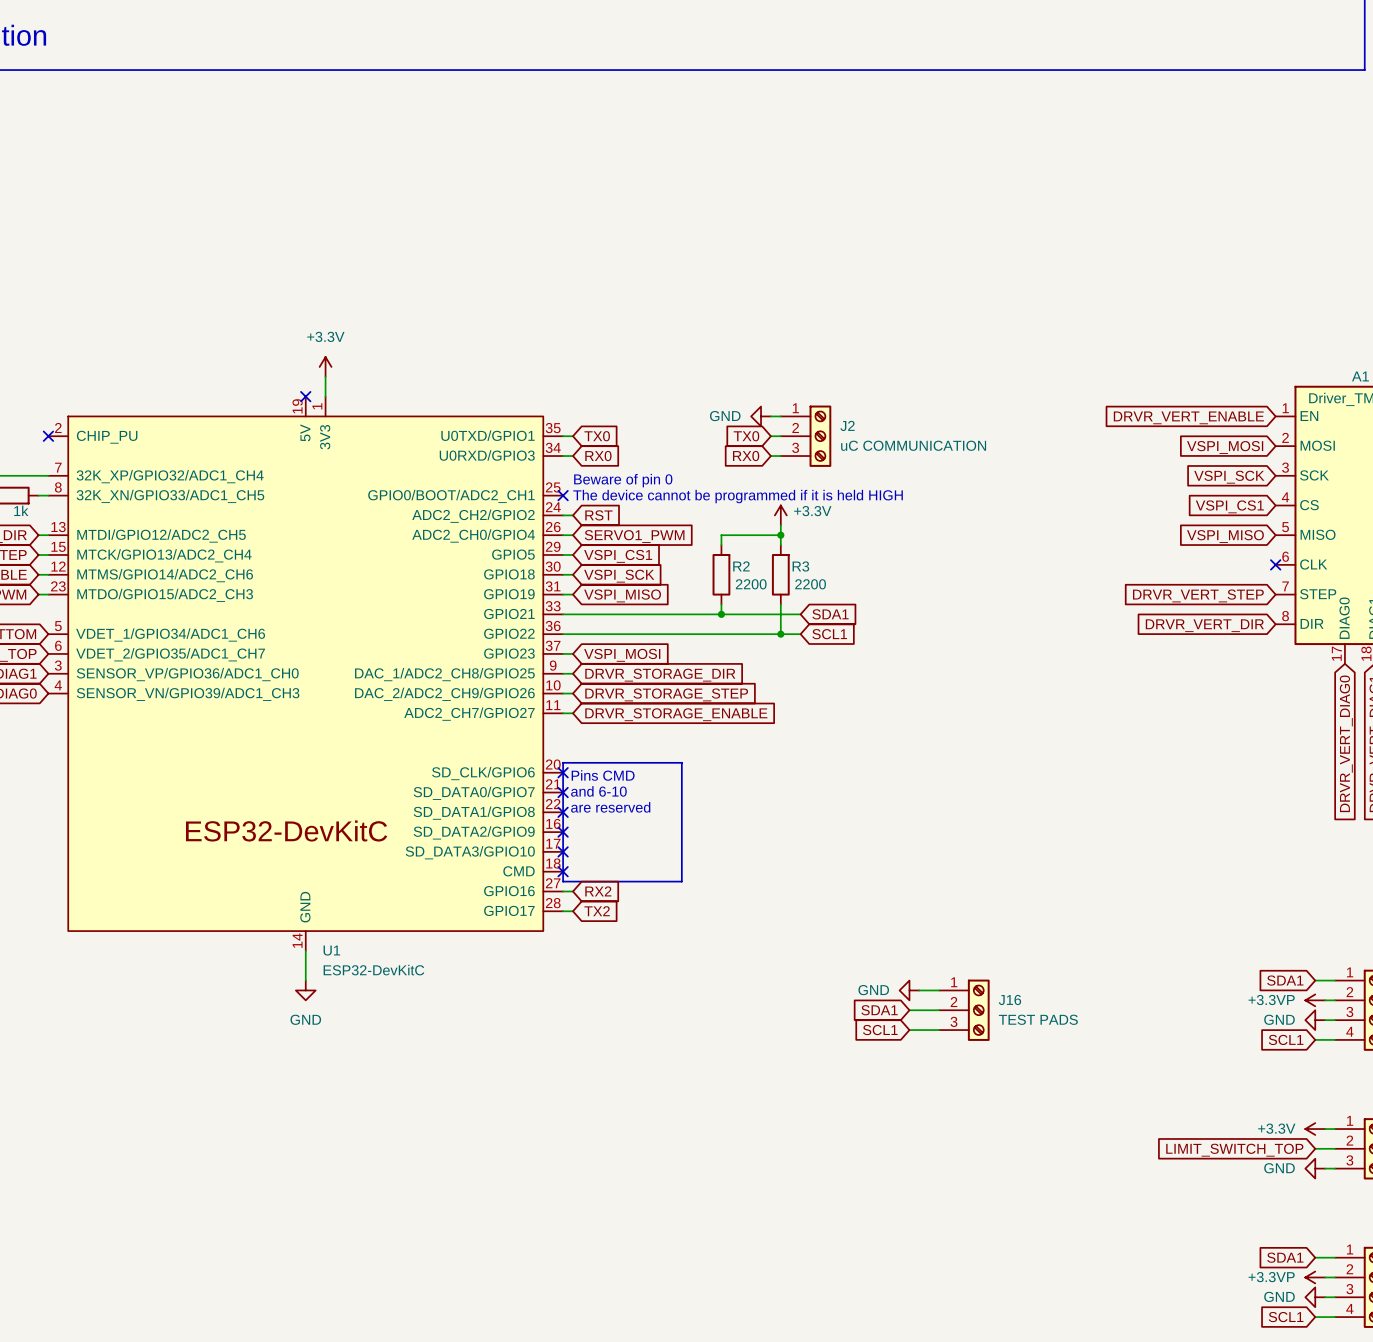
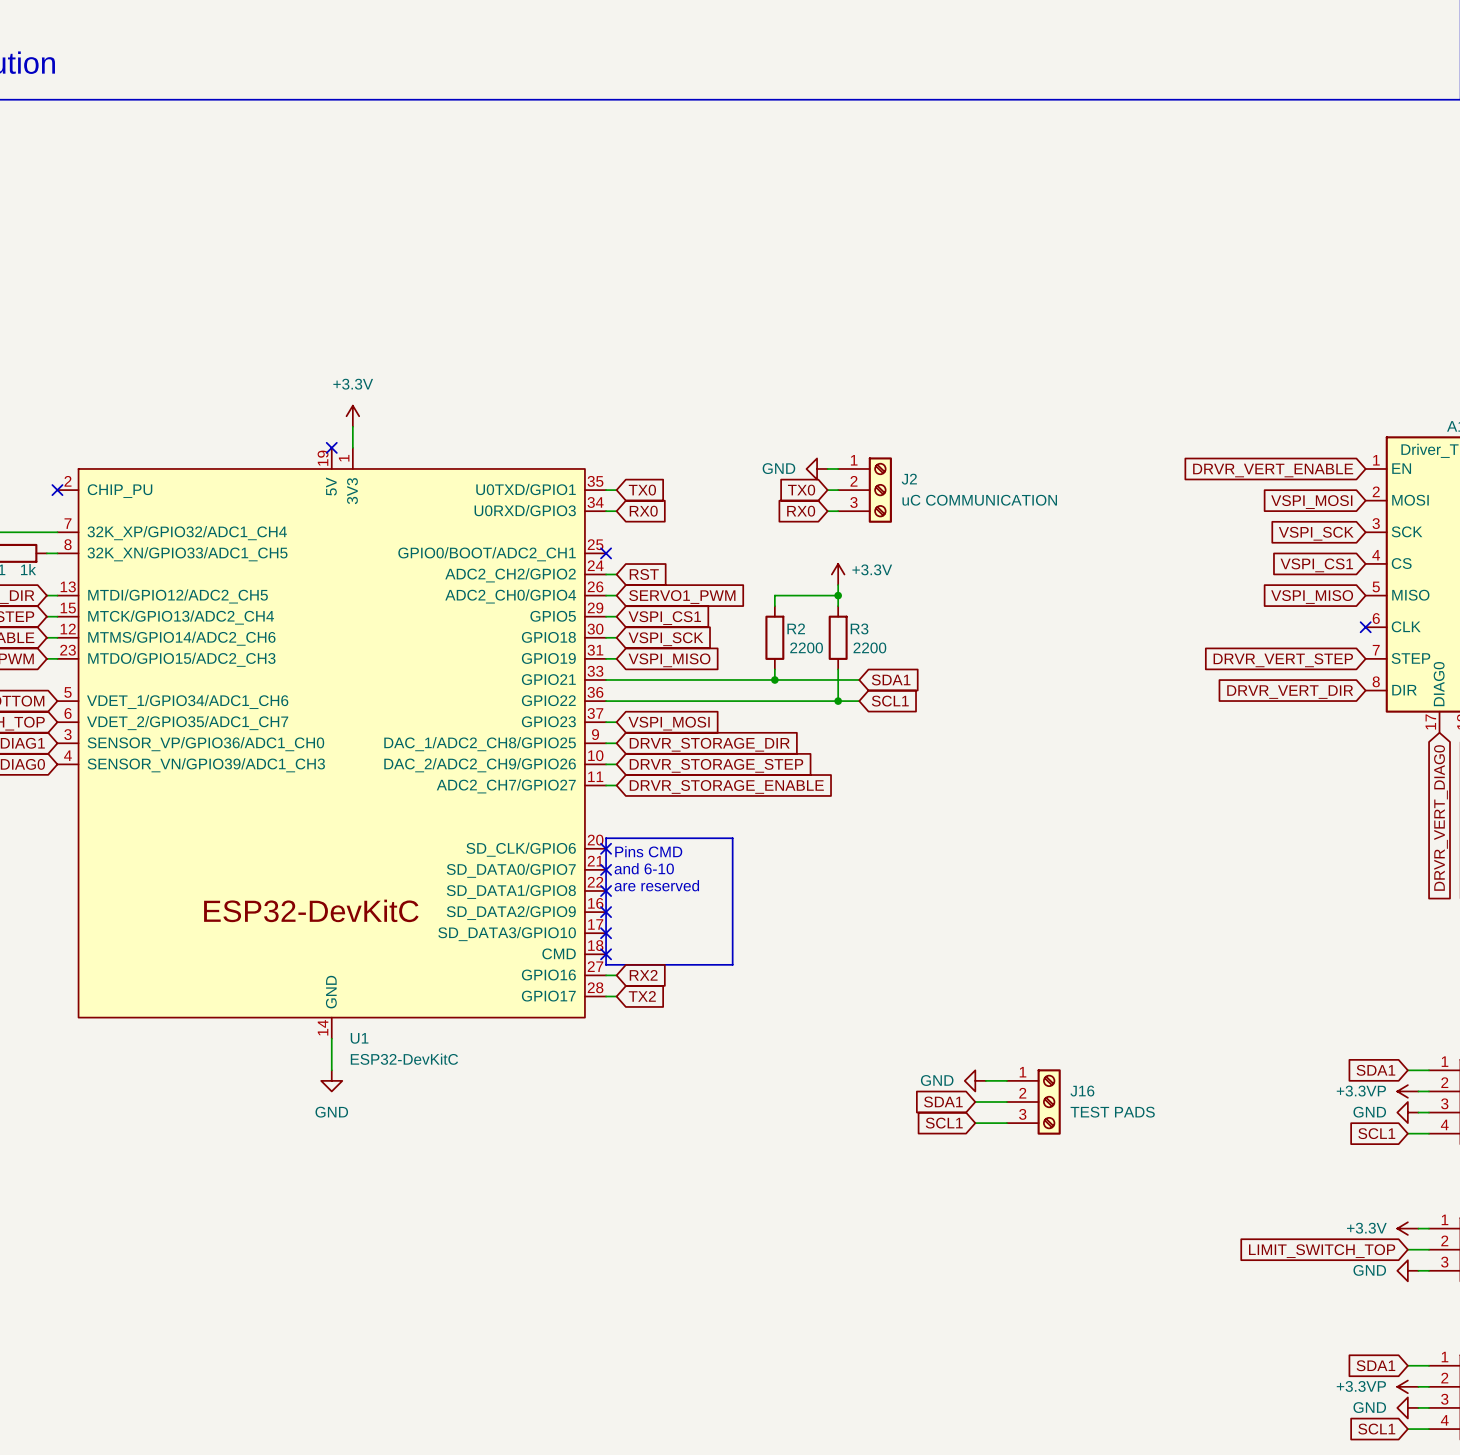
text: Beware of pin 0 (623, 480) -> none
text: The device cannot be programmed if it is held HIGH (738, 496) -> none

